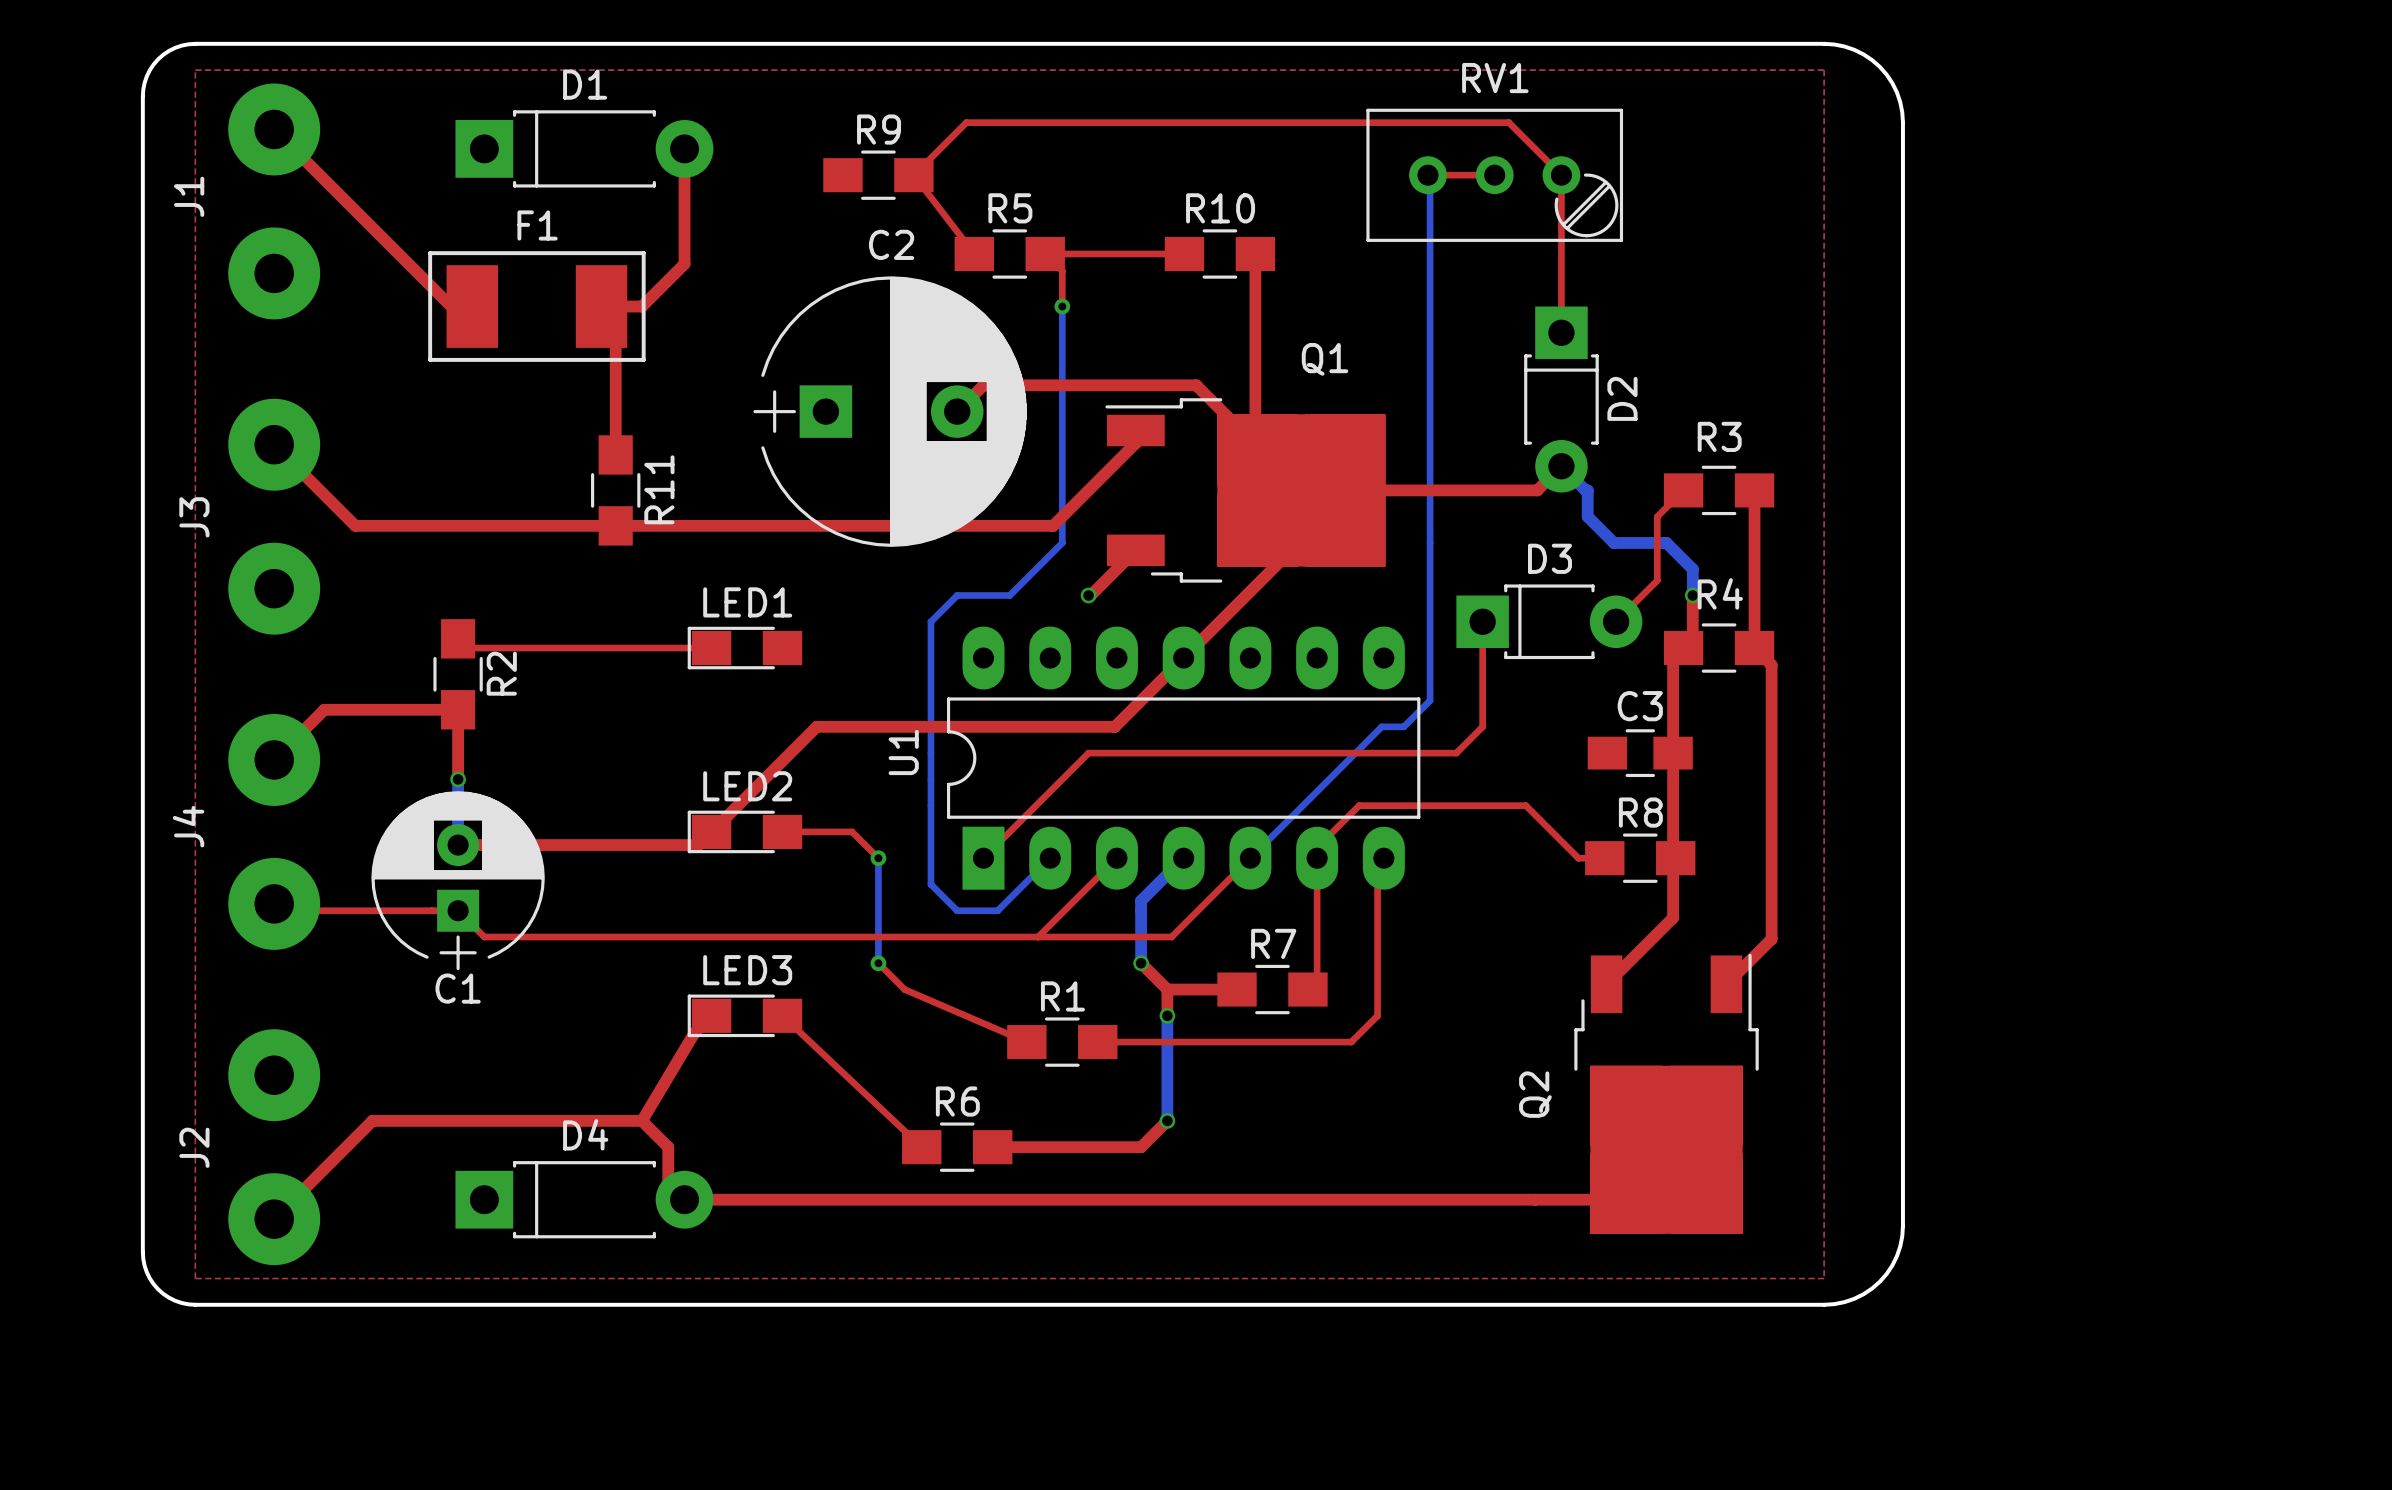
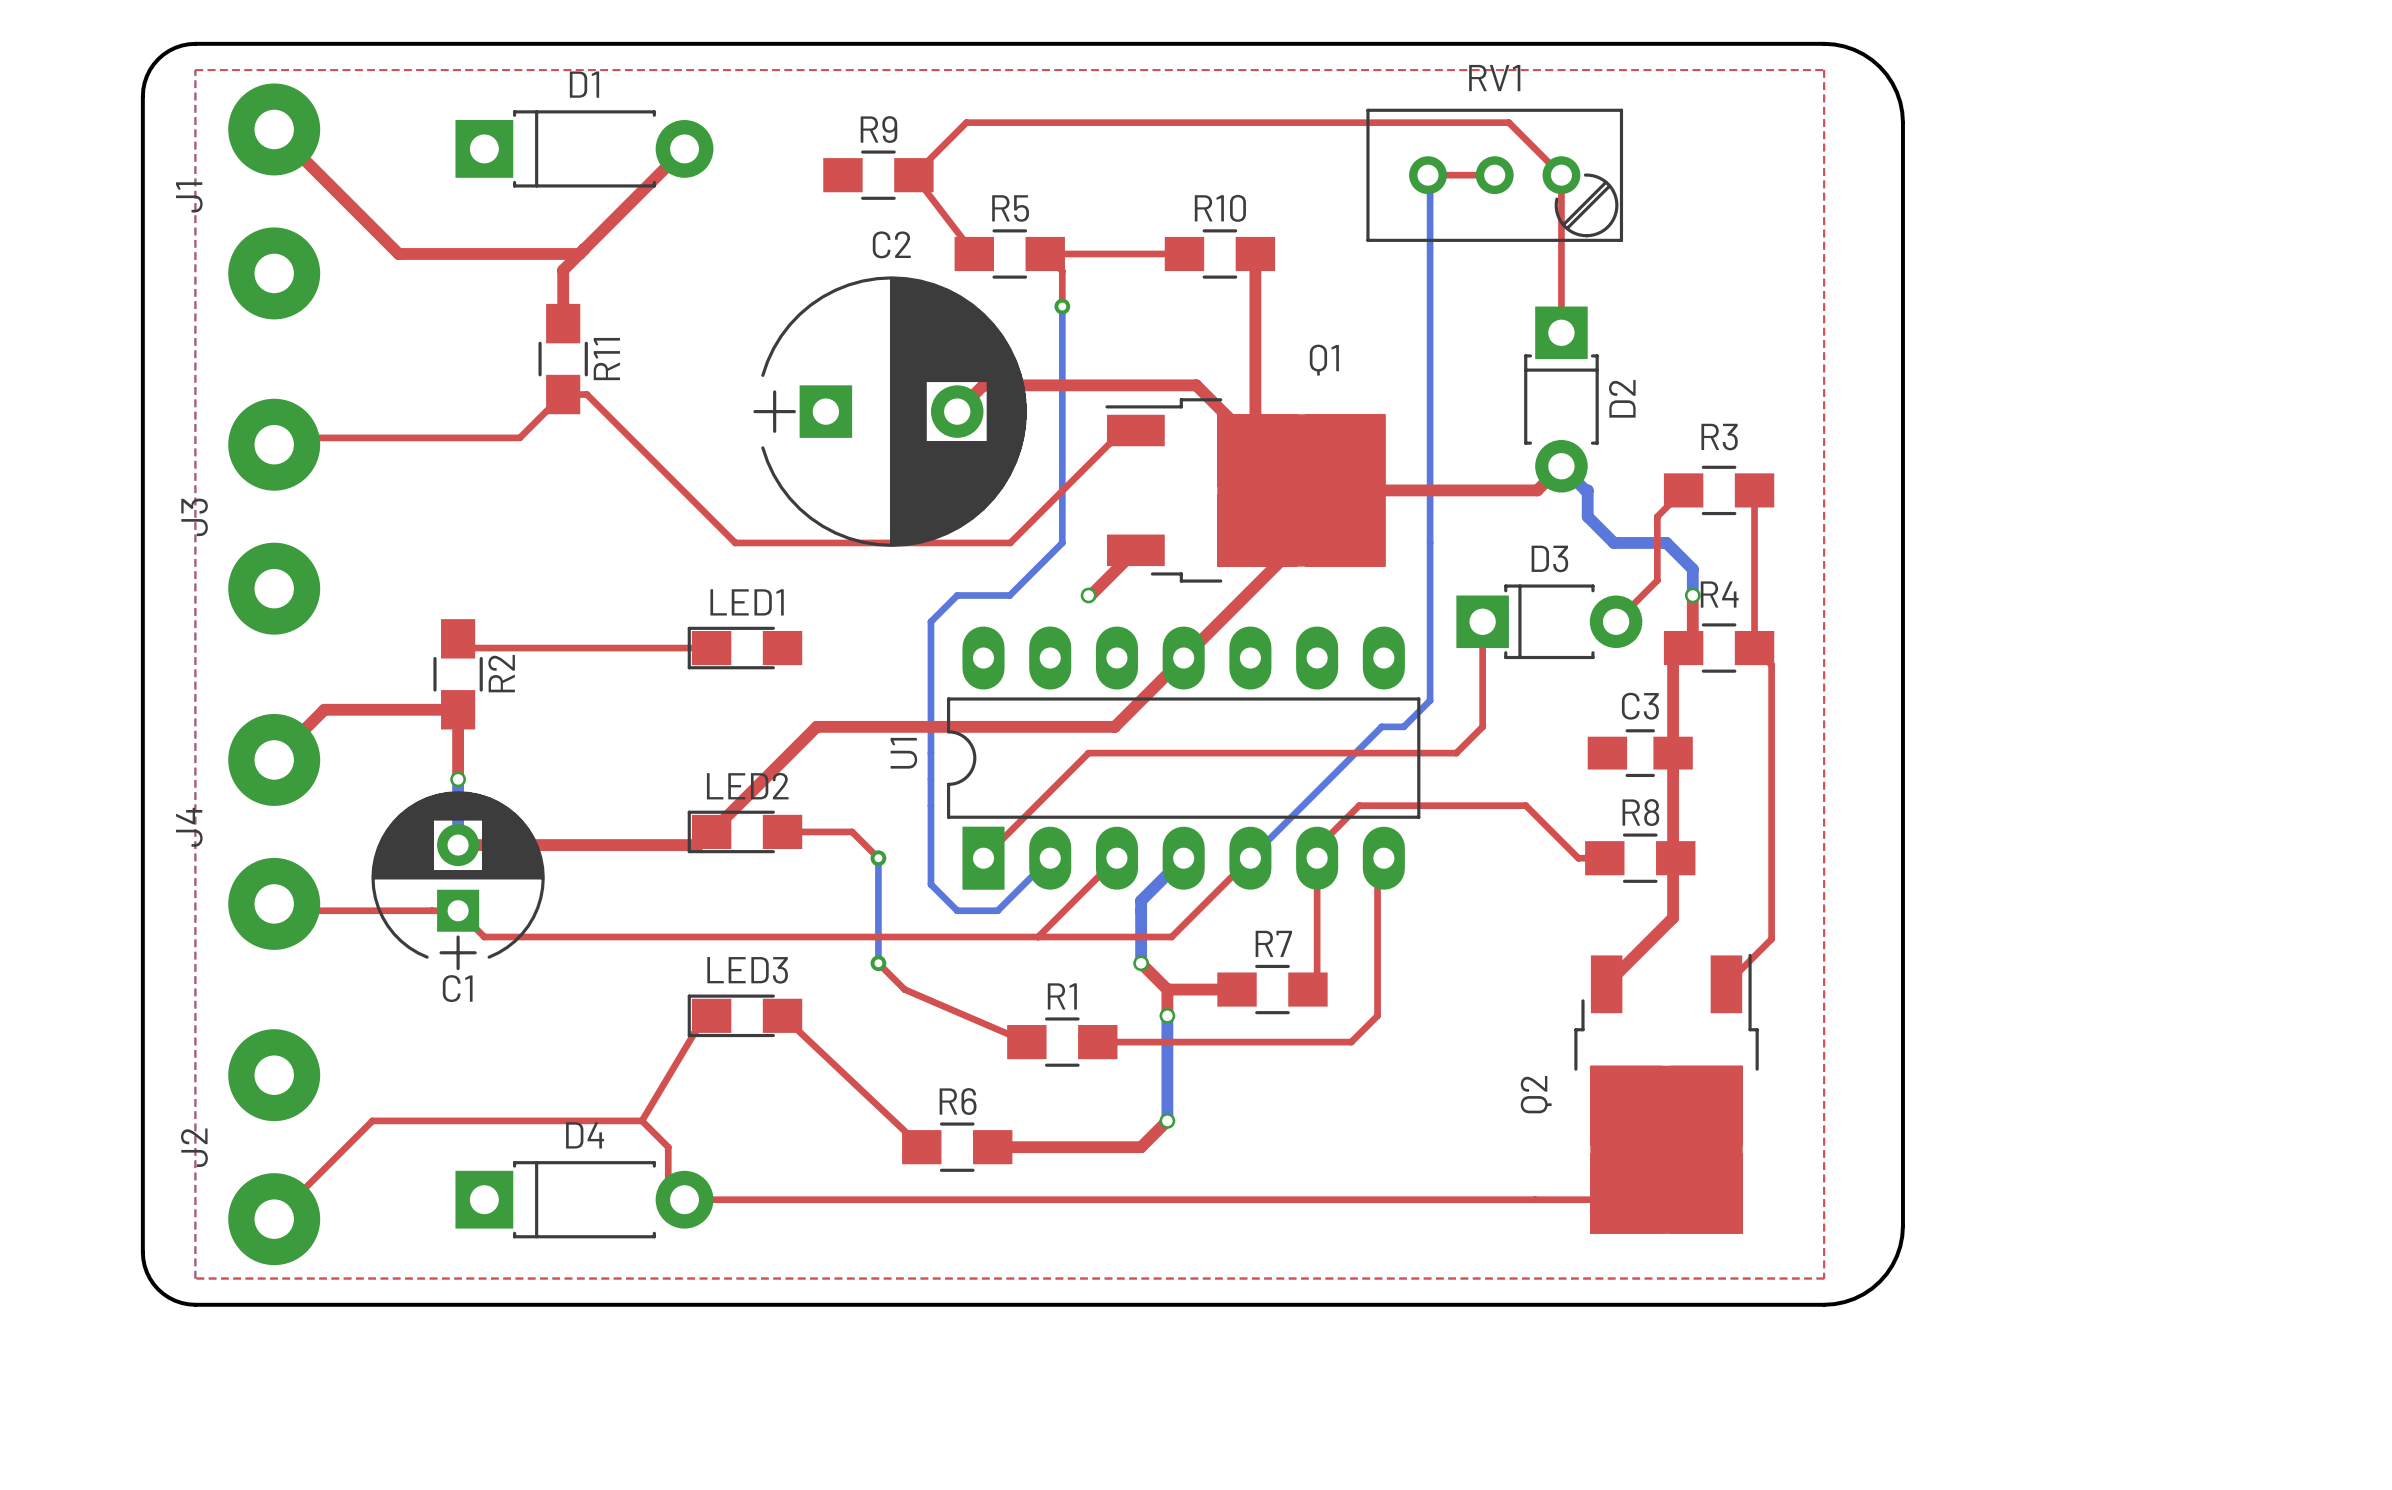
top track: (684, 148) (684, 263) (641, 306) (601, 306) (615, 320) (615, 454) -> (684, 148) (563, 270) (563, 323)
top track: (398, 253) (451, 306) (472, 306) -> (398, 253) (579, 253)
F1: (536, 306) -> none
top track: none -> (1122, 430) (1010, 542) (735, 542) (586, 394) (563, 394) (519, 437) (281, 437)
top track: (1135, 430) (1135, 443) (1053, 525) (355, 525) (274, 444) -> none
R11 position: (615, 490) -> (563, 359)
top track width: thick (1754, 490) (1754, 648) (1771, 665) (1771, 939) (1726, 984) (1719, 976) -> thin (1754, 490) (1754, 648) (1771, 665) (1771, 939) (1726, 984) (1719, 976)
top track width: thick (711, 1015) (694, 1032) (641, 1120) -> thin (711, 1015) (694, 1032) (641, 1120)
top track width: thick (641, 1120) (668, 1147) (668, 1183) (684, 1199) (1616, 1199) (1666, 1149) -> thin (641, 1120) (668, 1147) (668, 1183) (684, 1199) (1616, 1199) (1666, 1149)
top track width: thick (641, 1120) (372, 1120) (274, 1219) -> thin (641, 1120) (372, 1120) (274, 1219)

